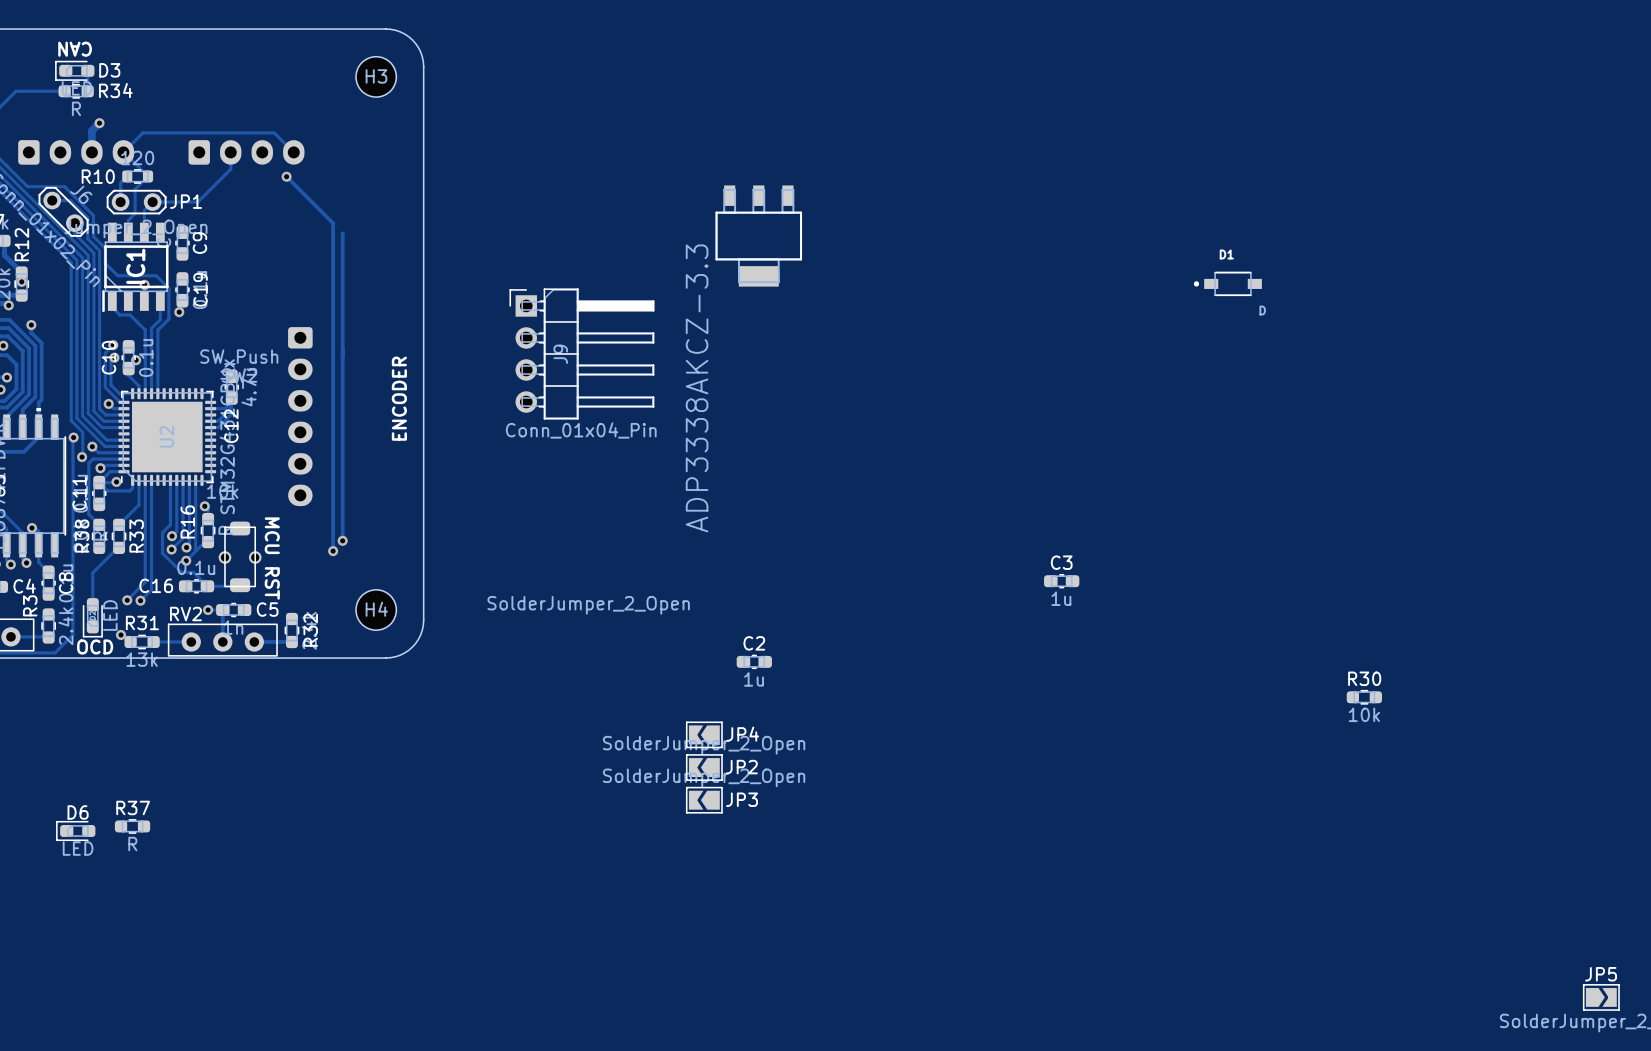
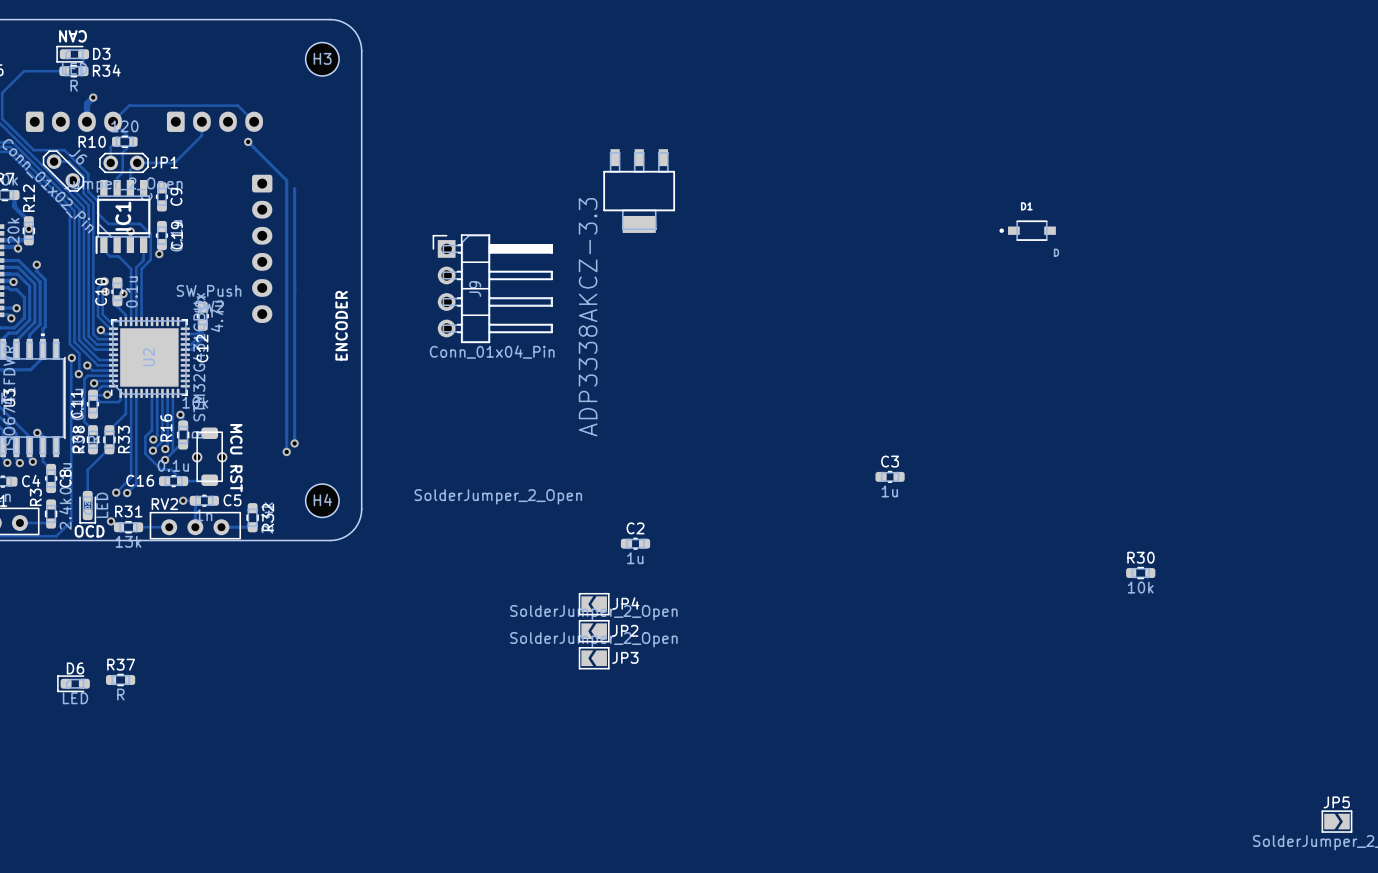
part position: (300, 416) -> (262, 248)

